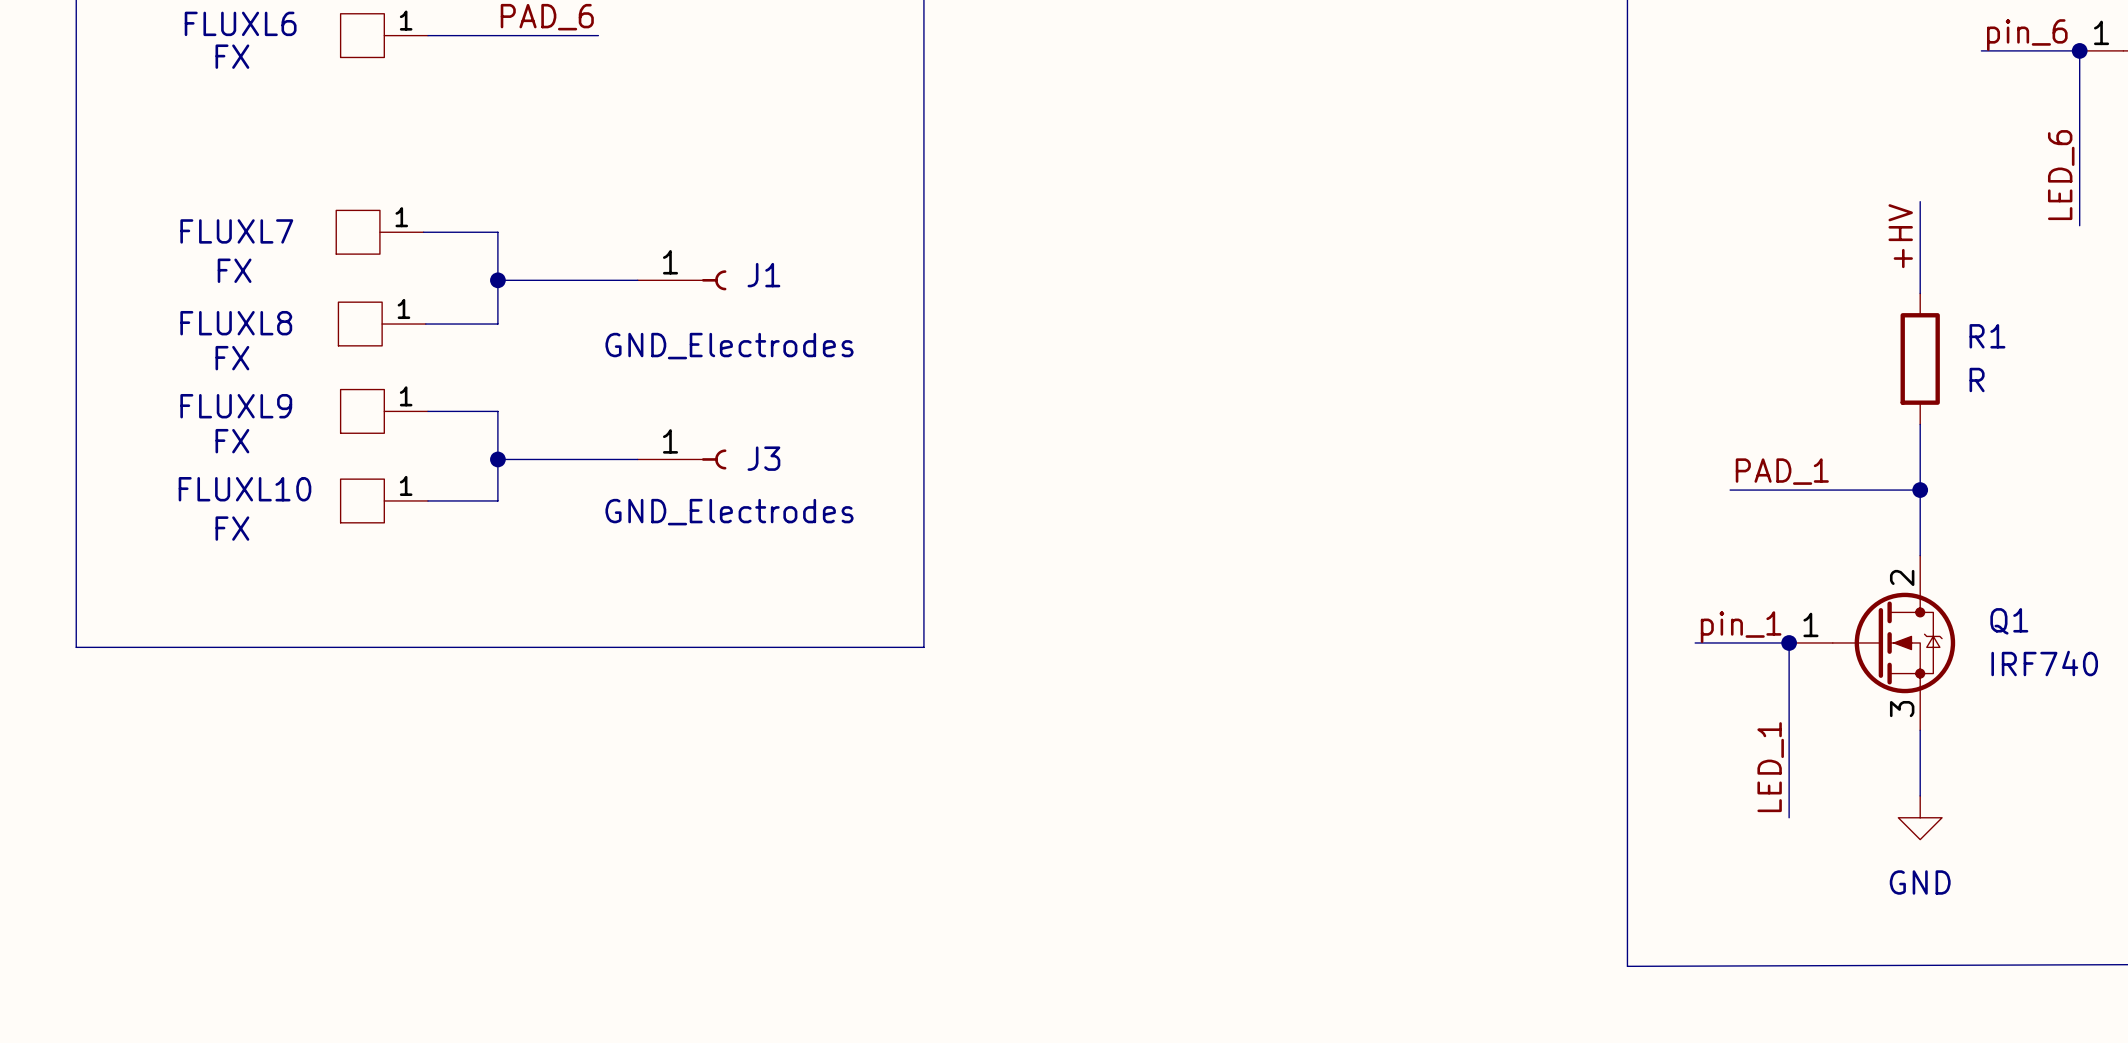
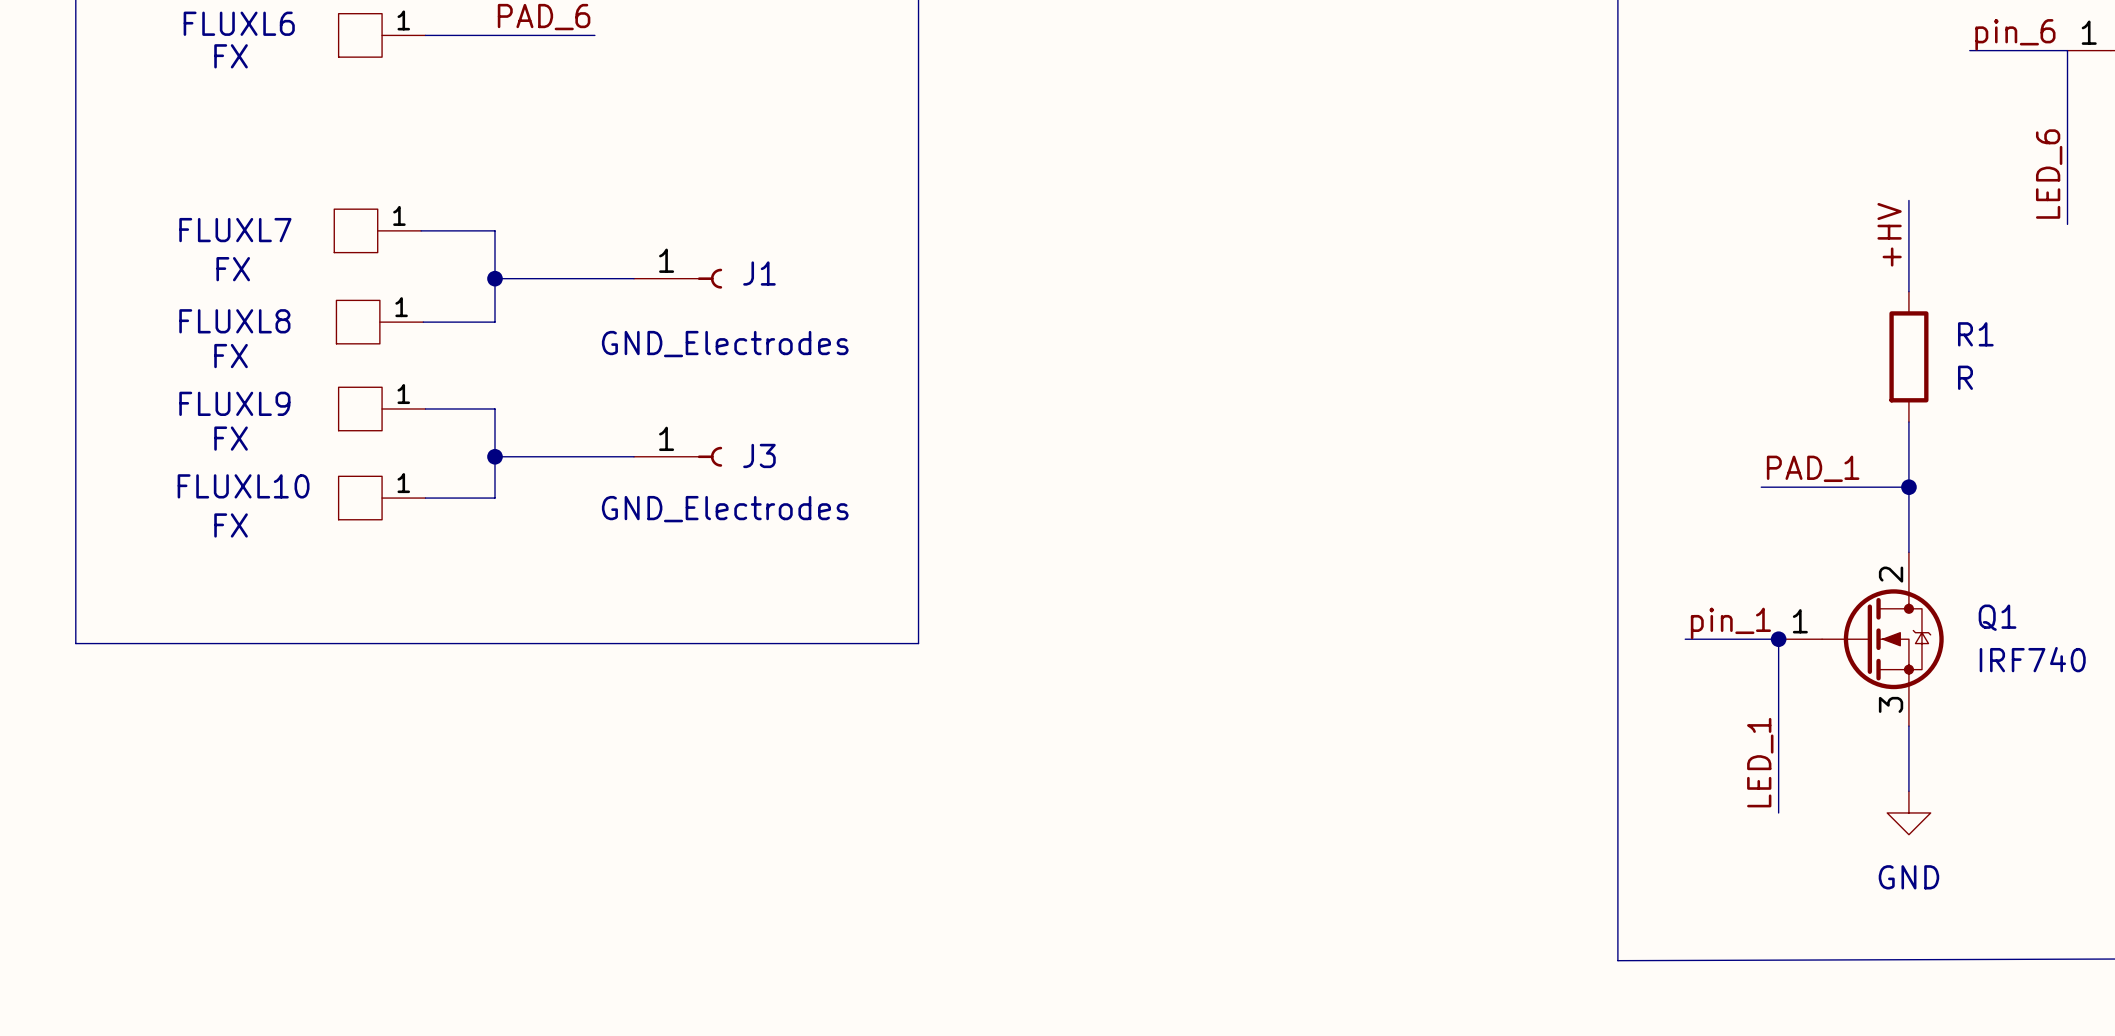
junction: (2079, 50) -> none
label position: PAD_1 (1782, 471) -> PAD_1 (1813, 468)
wire: (1730, 490) (1771, 490) -> none

